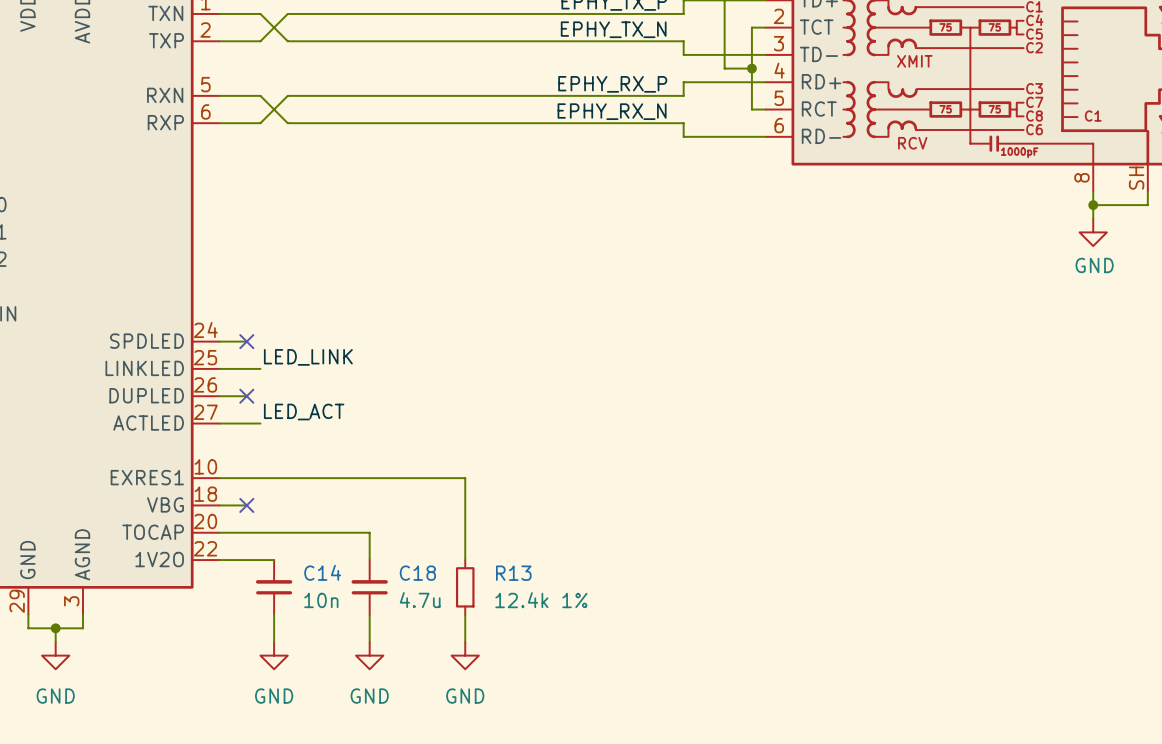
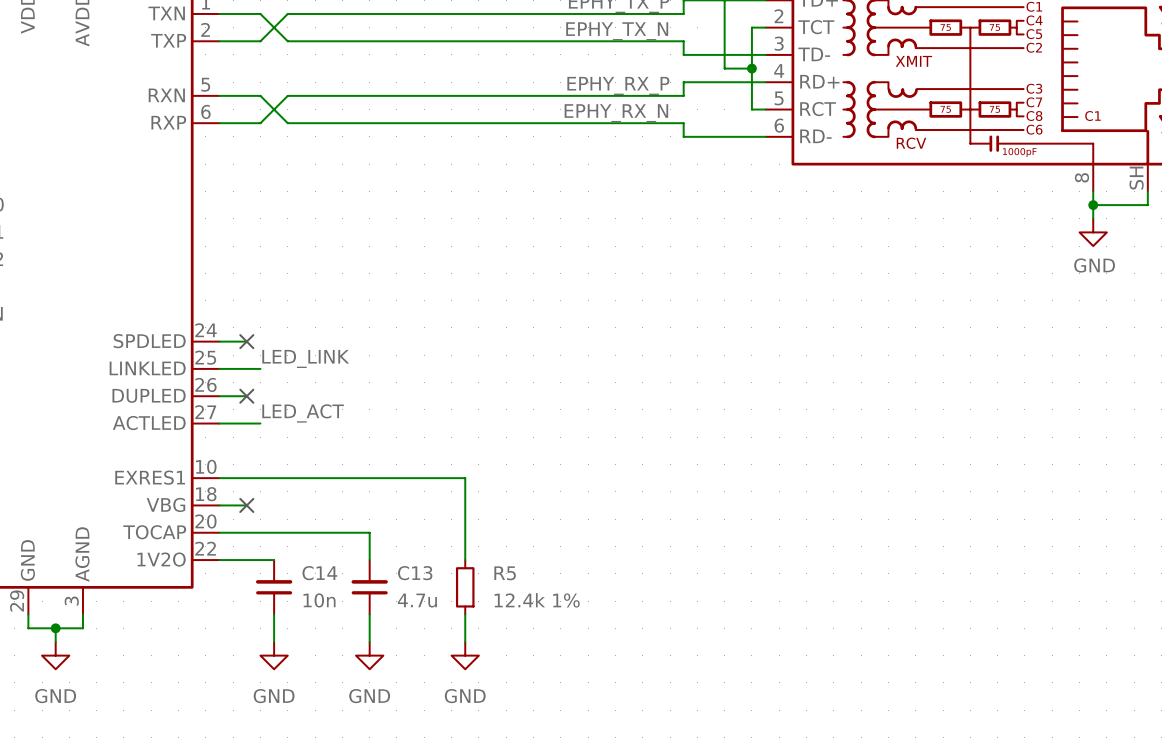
C18 name: C18 (417, 573) -> C13 (415, 573)
R13 name: R13 (513, 573) -> R5 (505, 573)

